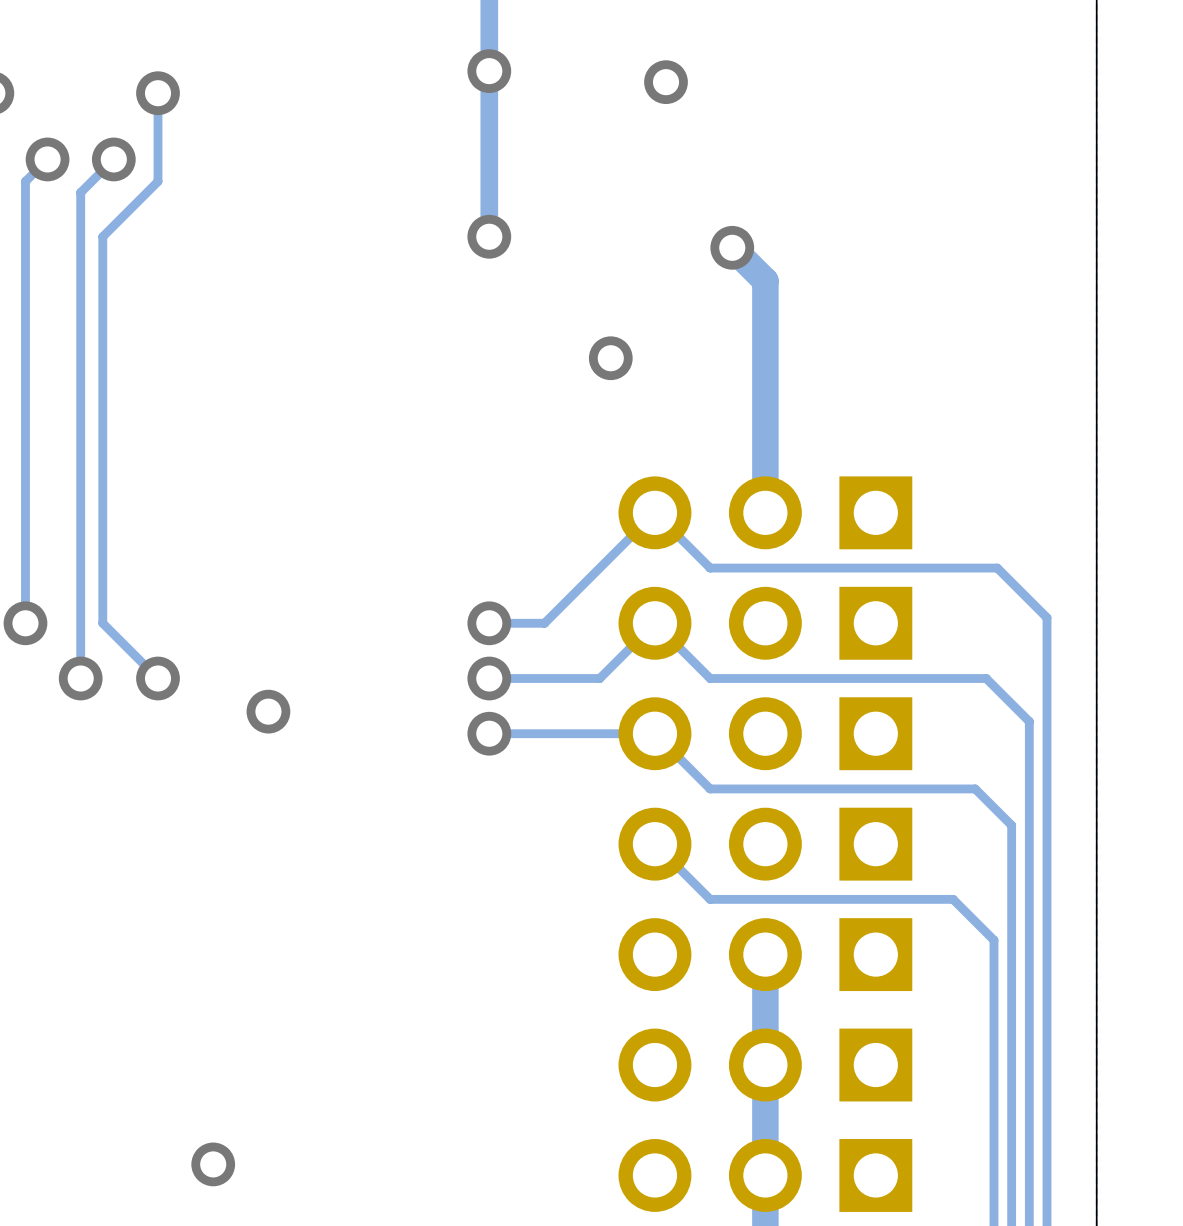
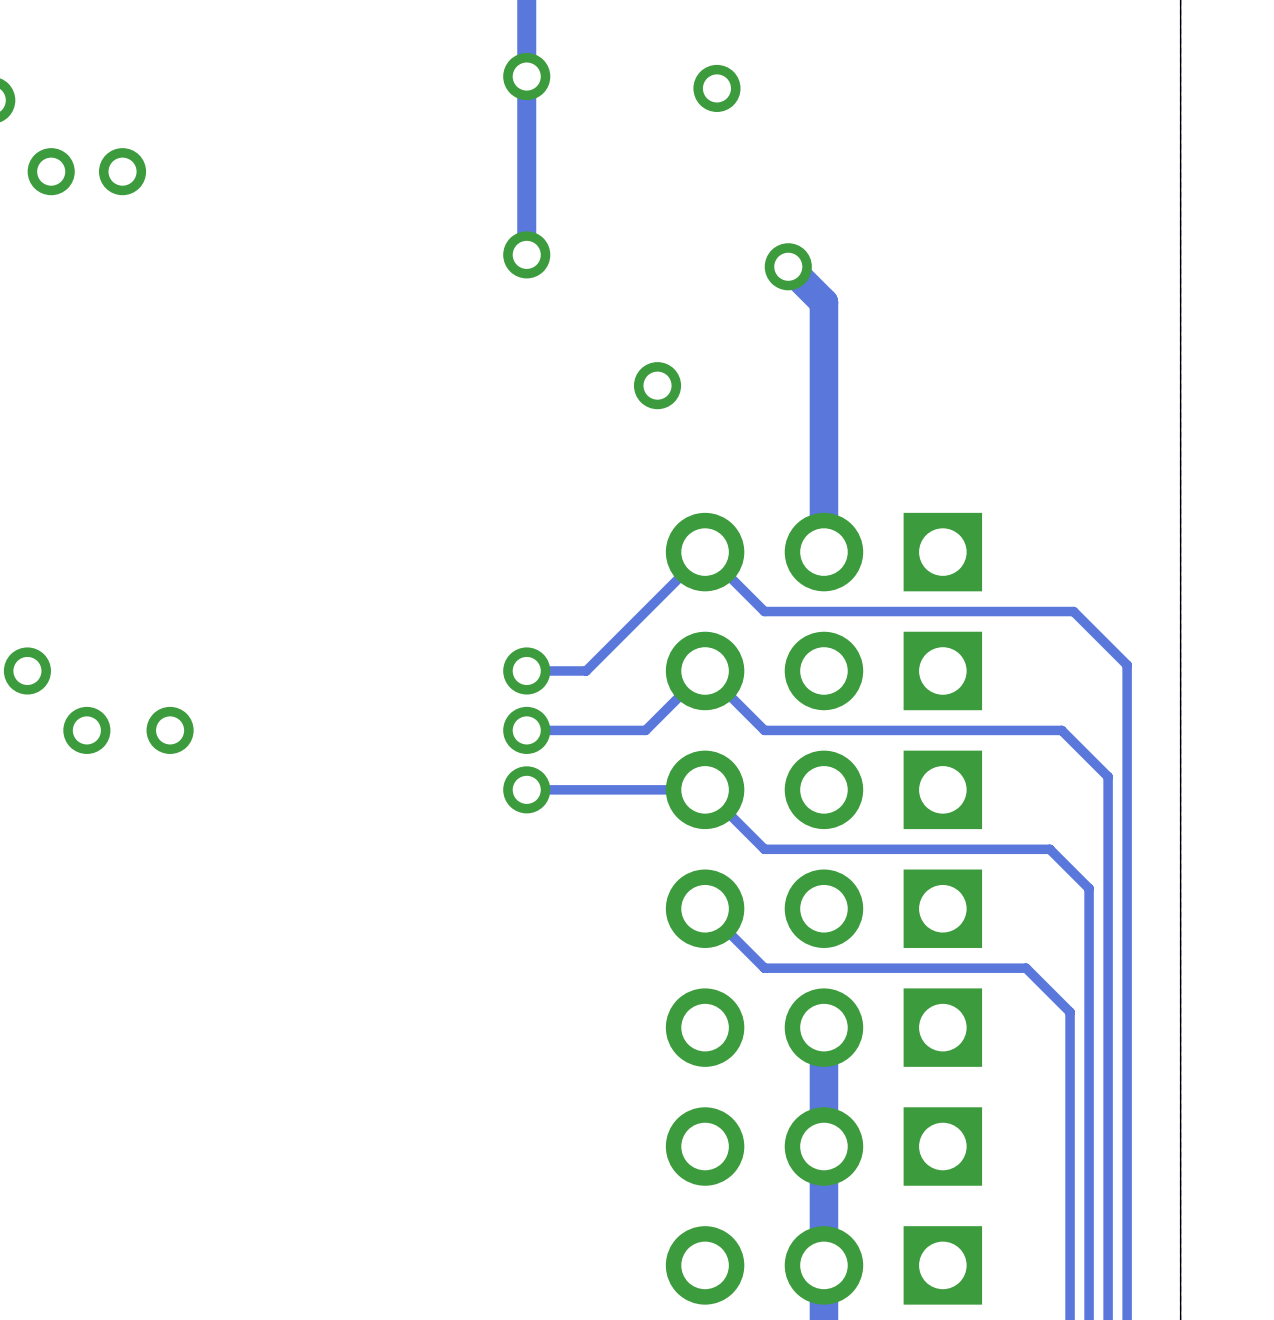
track: (158, 93) (158, 181) (102, 236) (102, 623) (158, 678) -> none
via: (158, 93) -> none
track: (47, 159) (25, 181) (25, 623) -> none
track: (113, 159) (80, 192) (80, 678) -> none
via: (268, 711) -> none
via: (213, 1164) -> none

